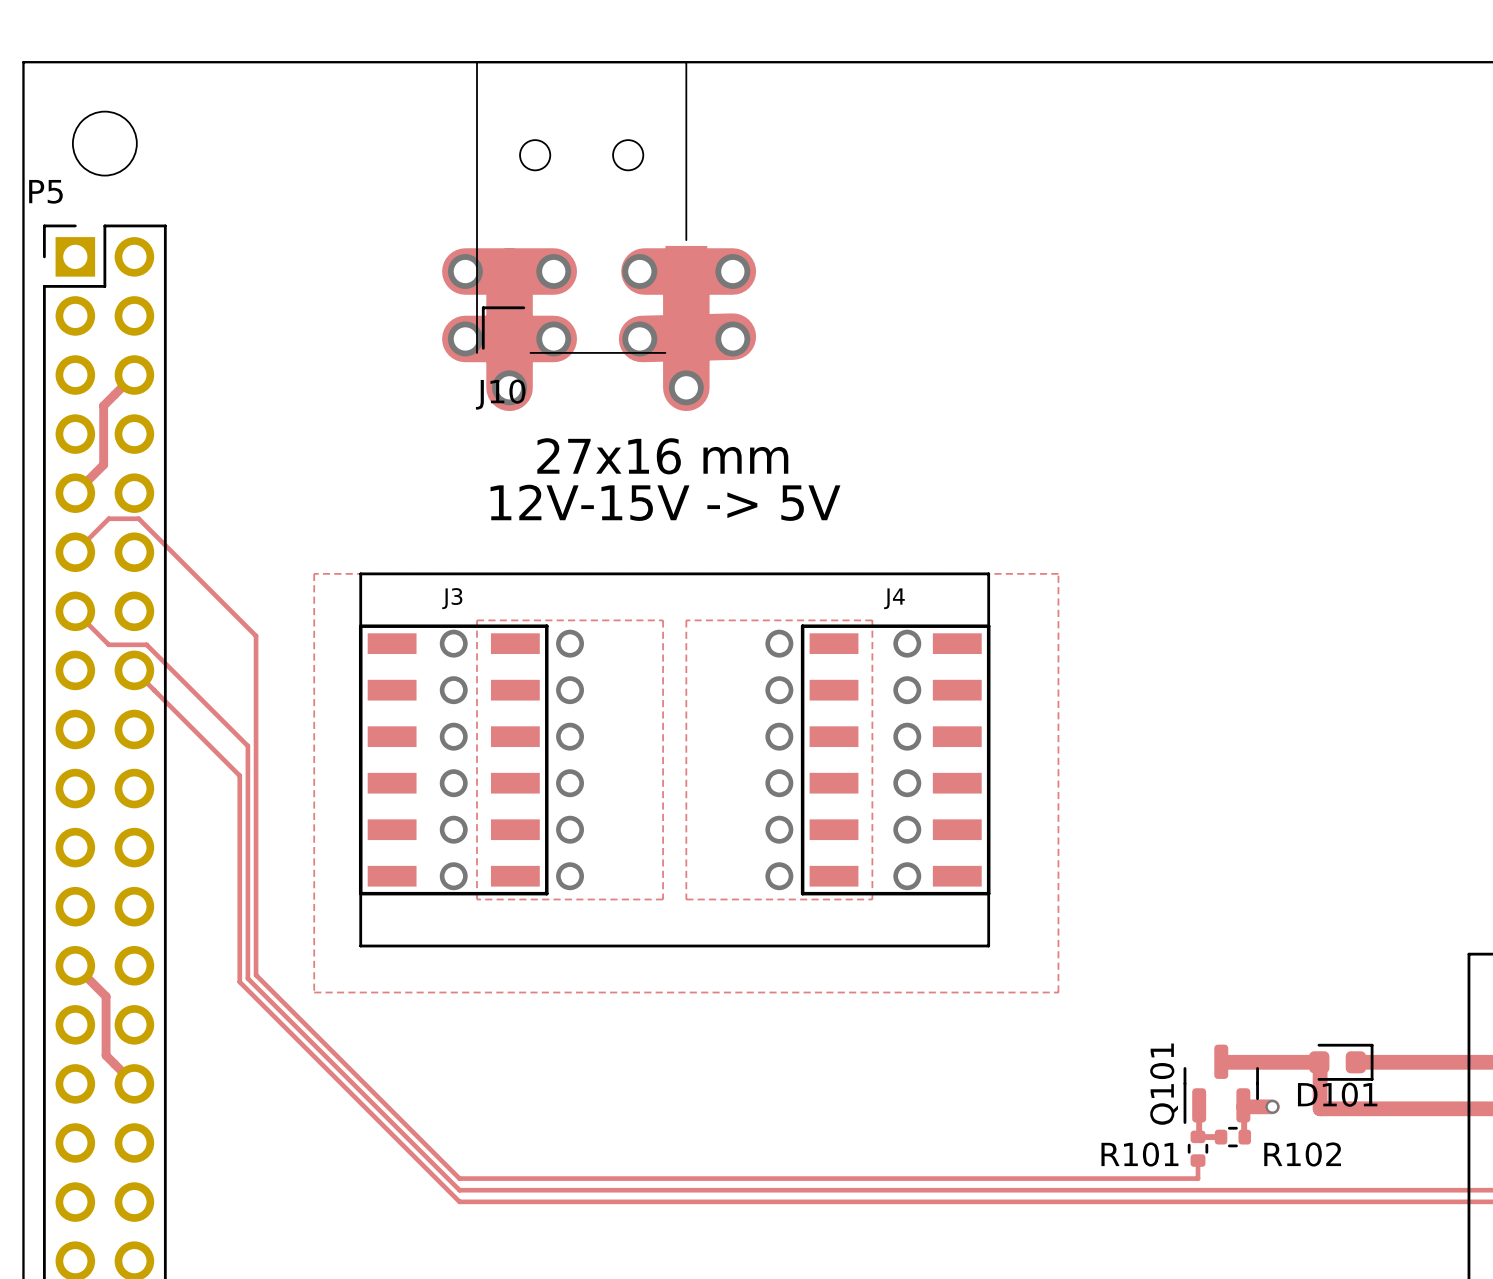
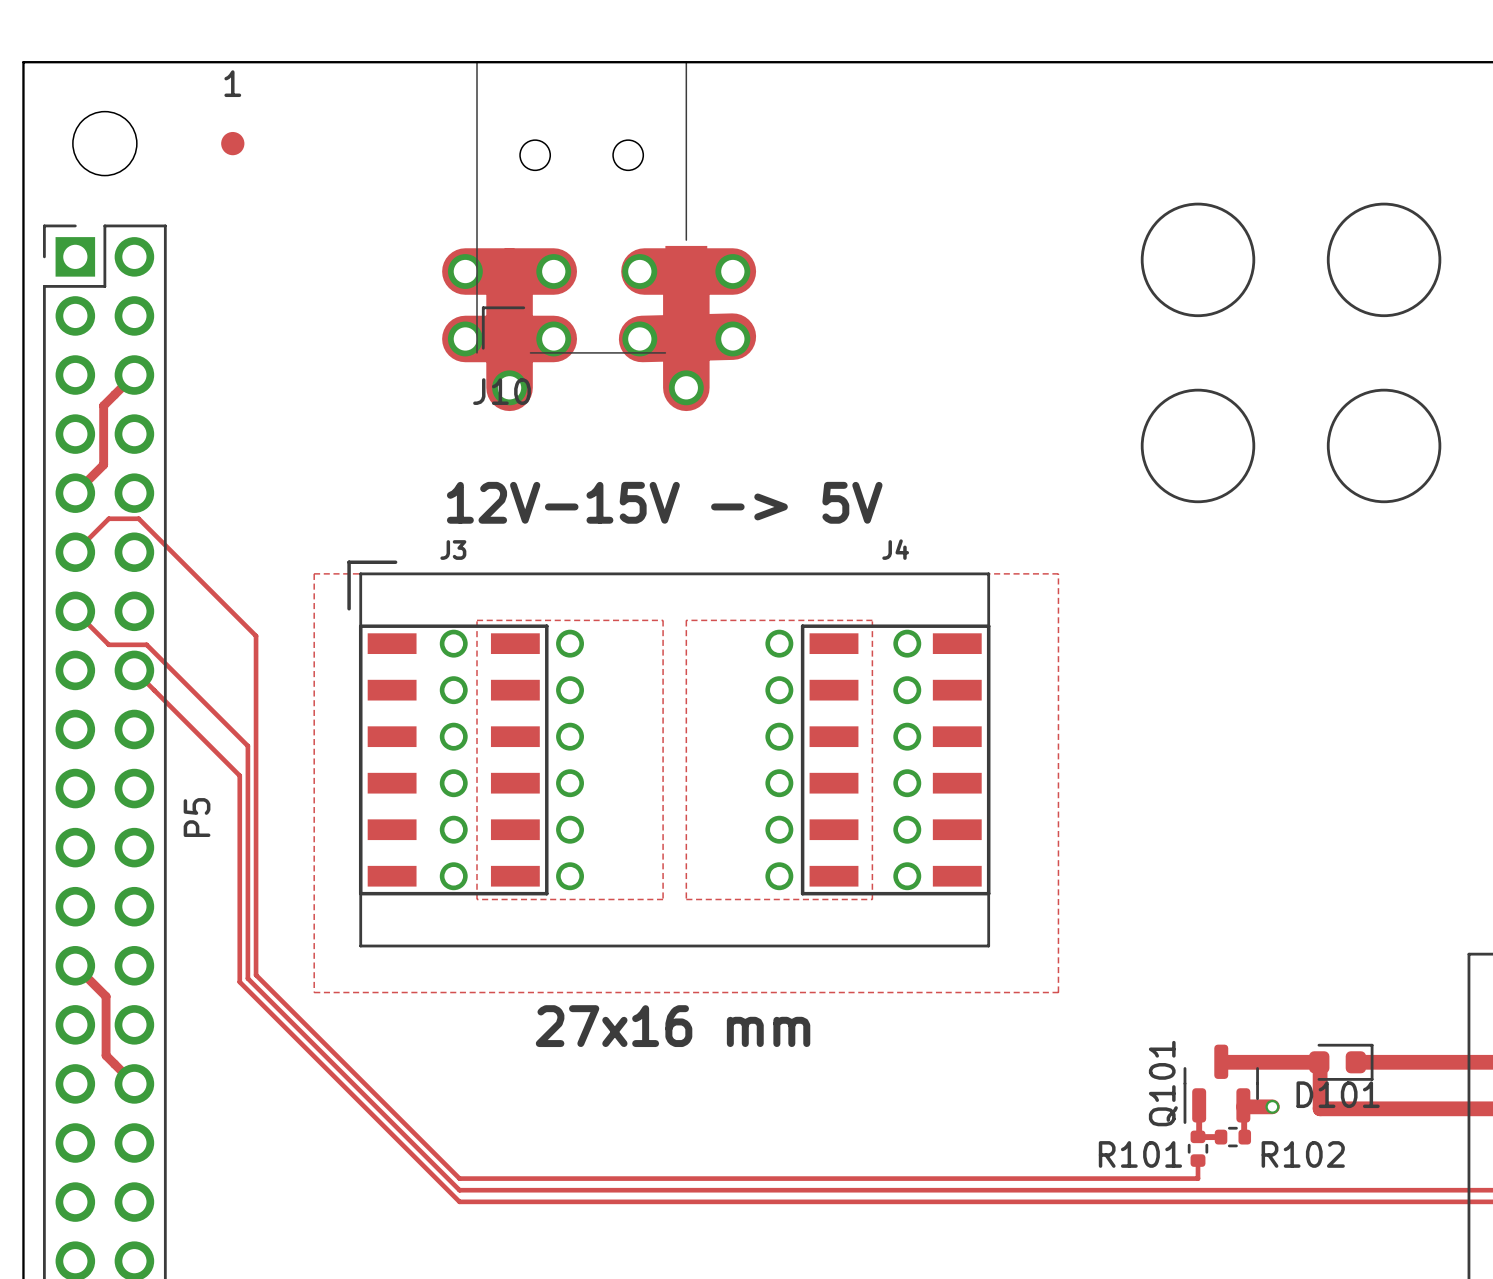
1: none -> (232, 143)
P5 name rotation: 0° (45, 191) -> 90° counterclockwise (197, 817)
P5 name position: P5 (45, 191) -> P5 (197, 817)
drawing: none -> [1140, 202, 1256, 318]
drawing: none -> [1326, 202, 1442, 318]
drawing: none -> [1140, 388, 1256, 504]
drawing: none -> [1326, 388, 1442, 504]
text position: 27x16 mm (662, 456) -> 27x16 mm (673, 1026)
line: none -> (395, 562) (349, 562) (349, 608)
J3 name position: J3 (452, 598) -> J3 (453, 550)
J4 name position: J4 (894, 598) -> J4 (895, 549)

